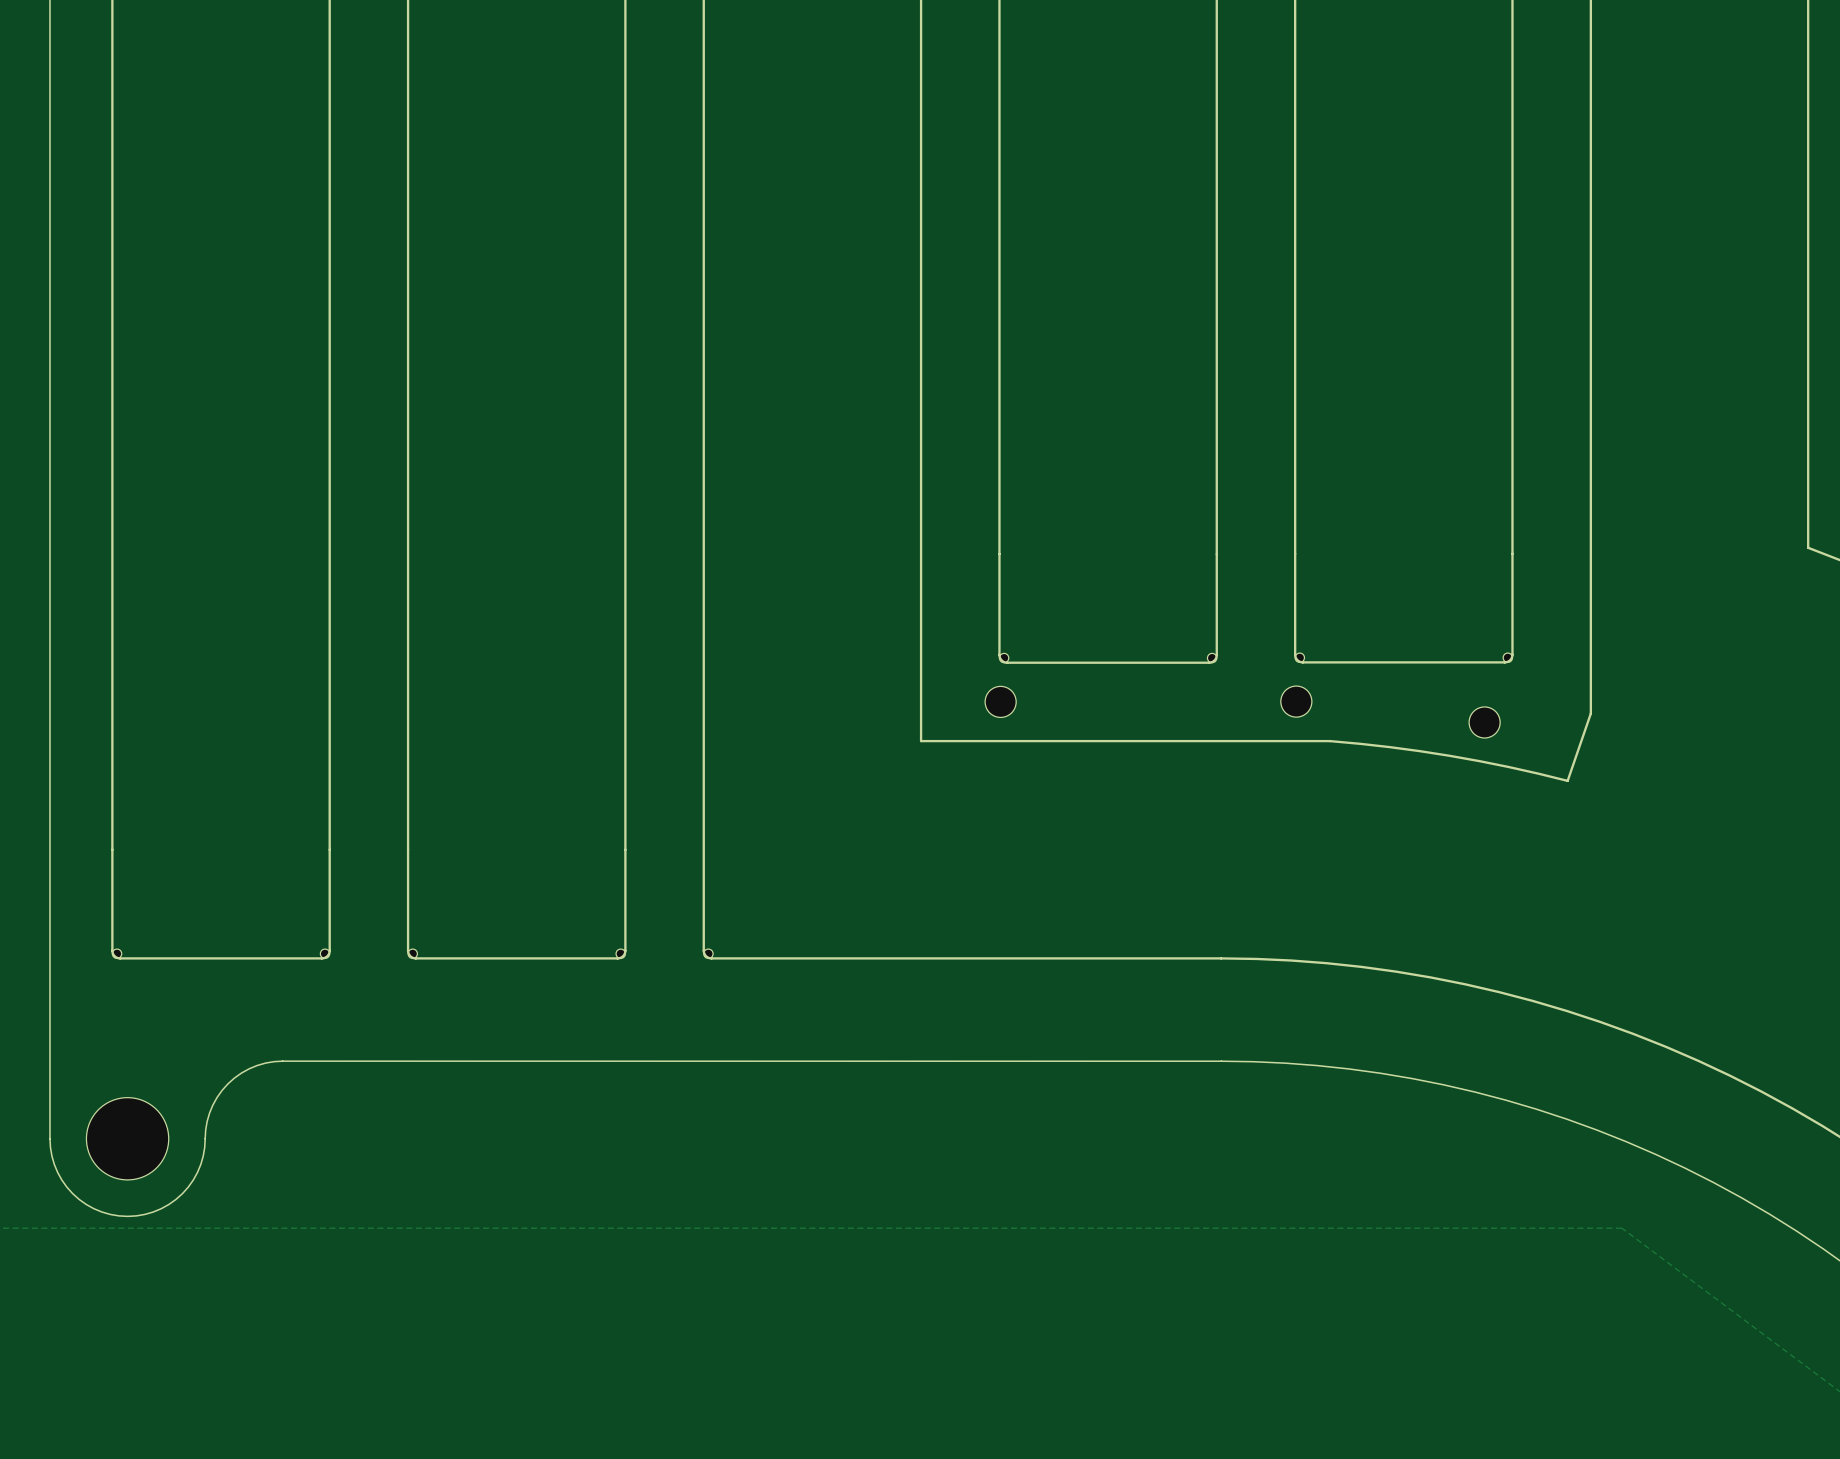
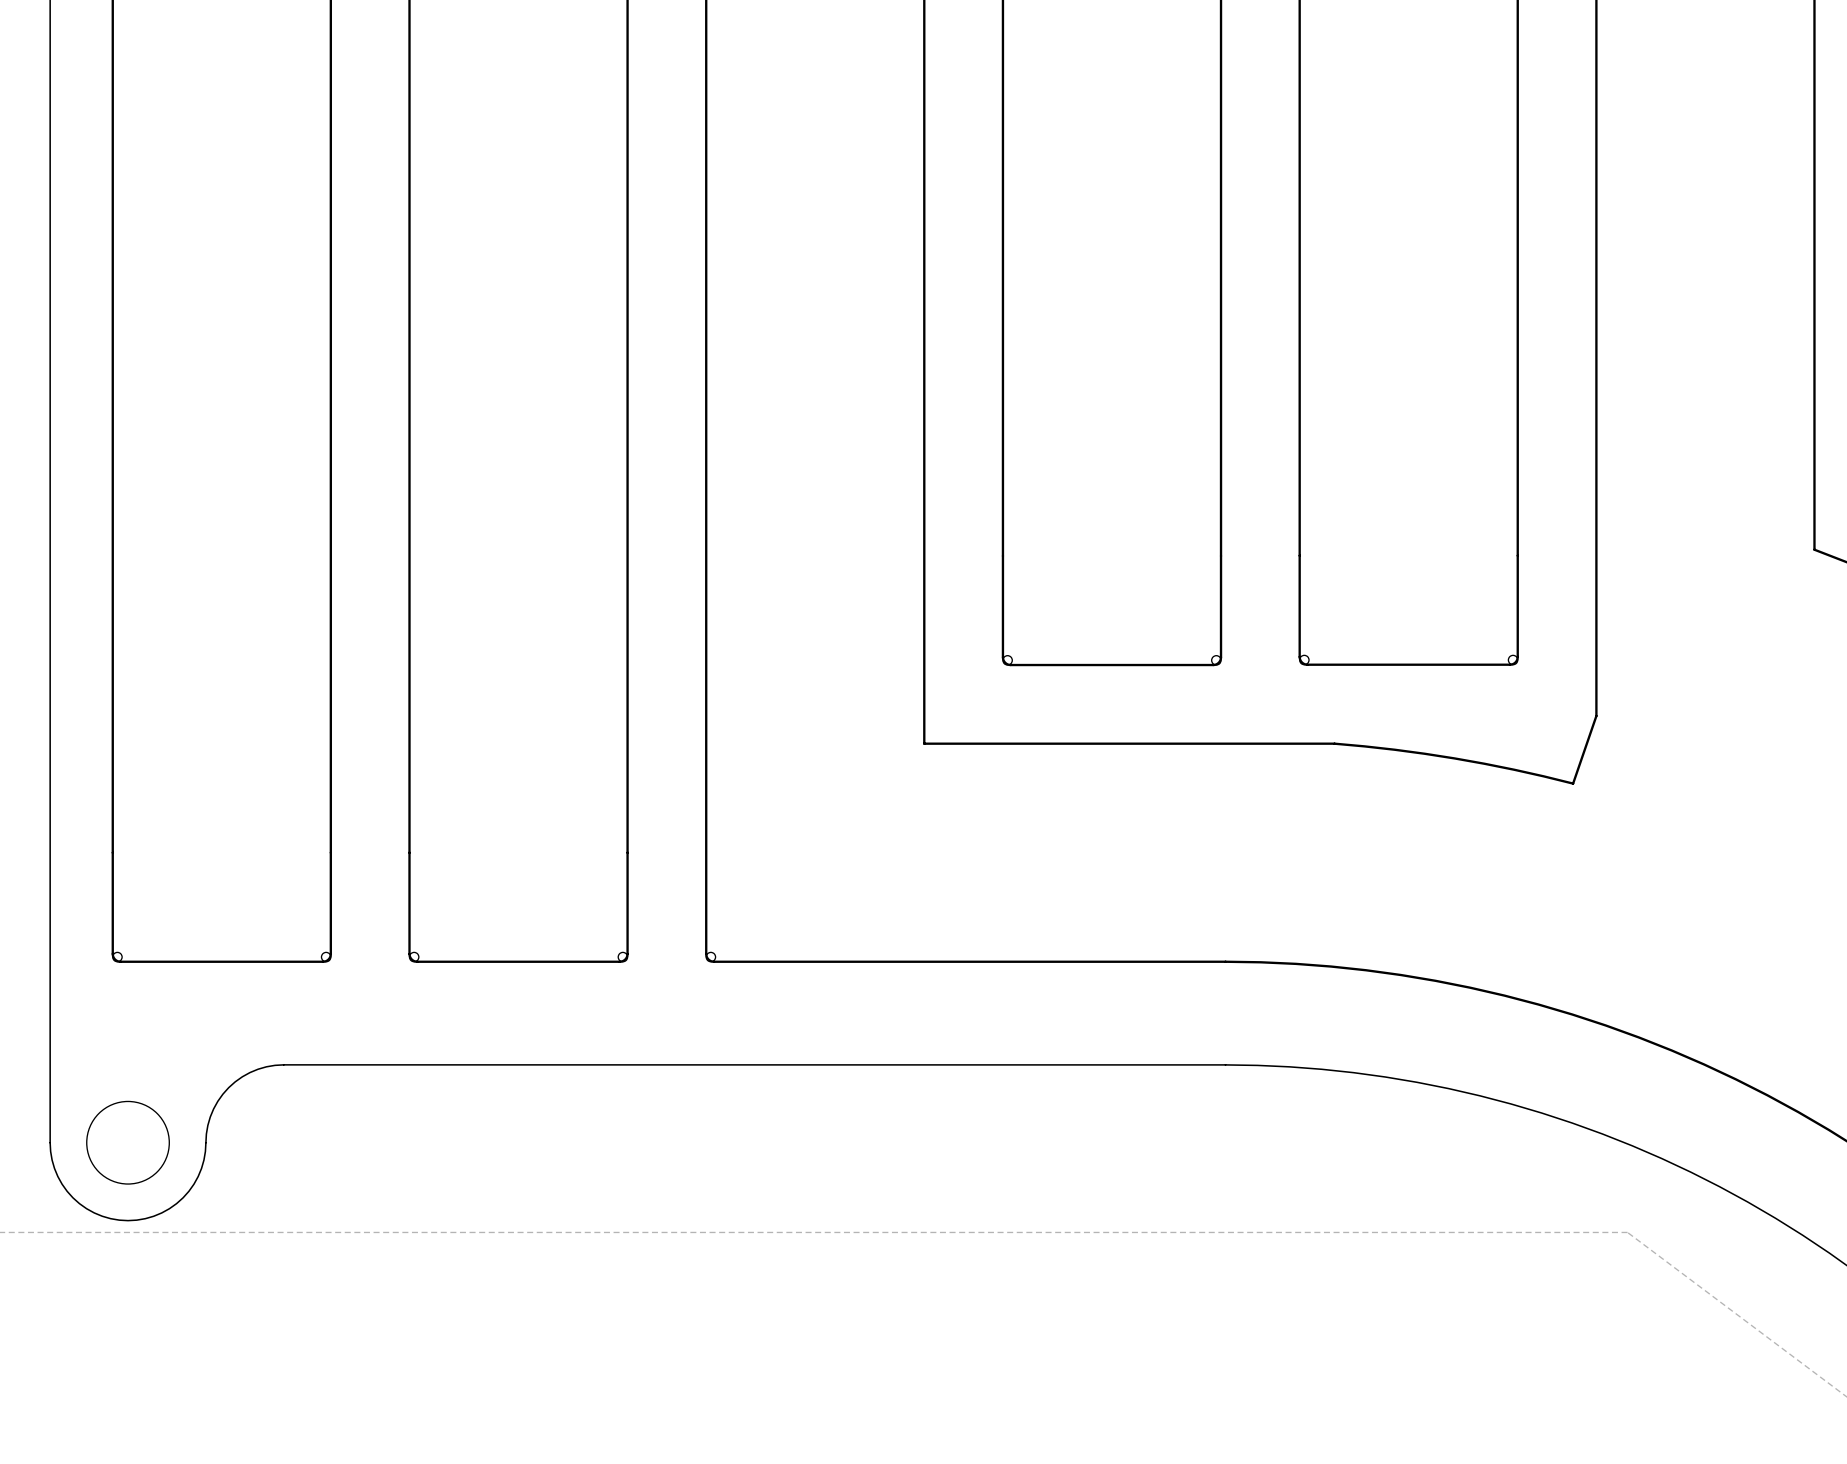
part: (1000, 701) -> none
part: (1296, 701) -> none
part: (1484, 722) -> none

